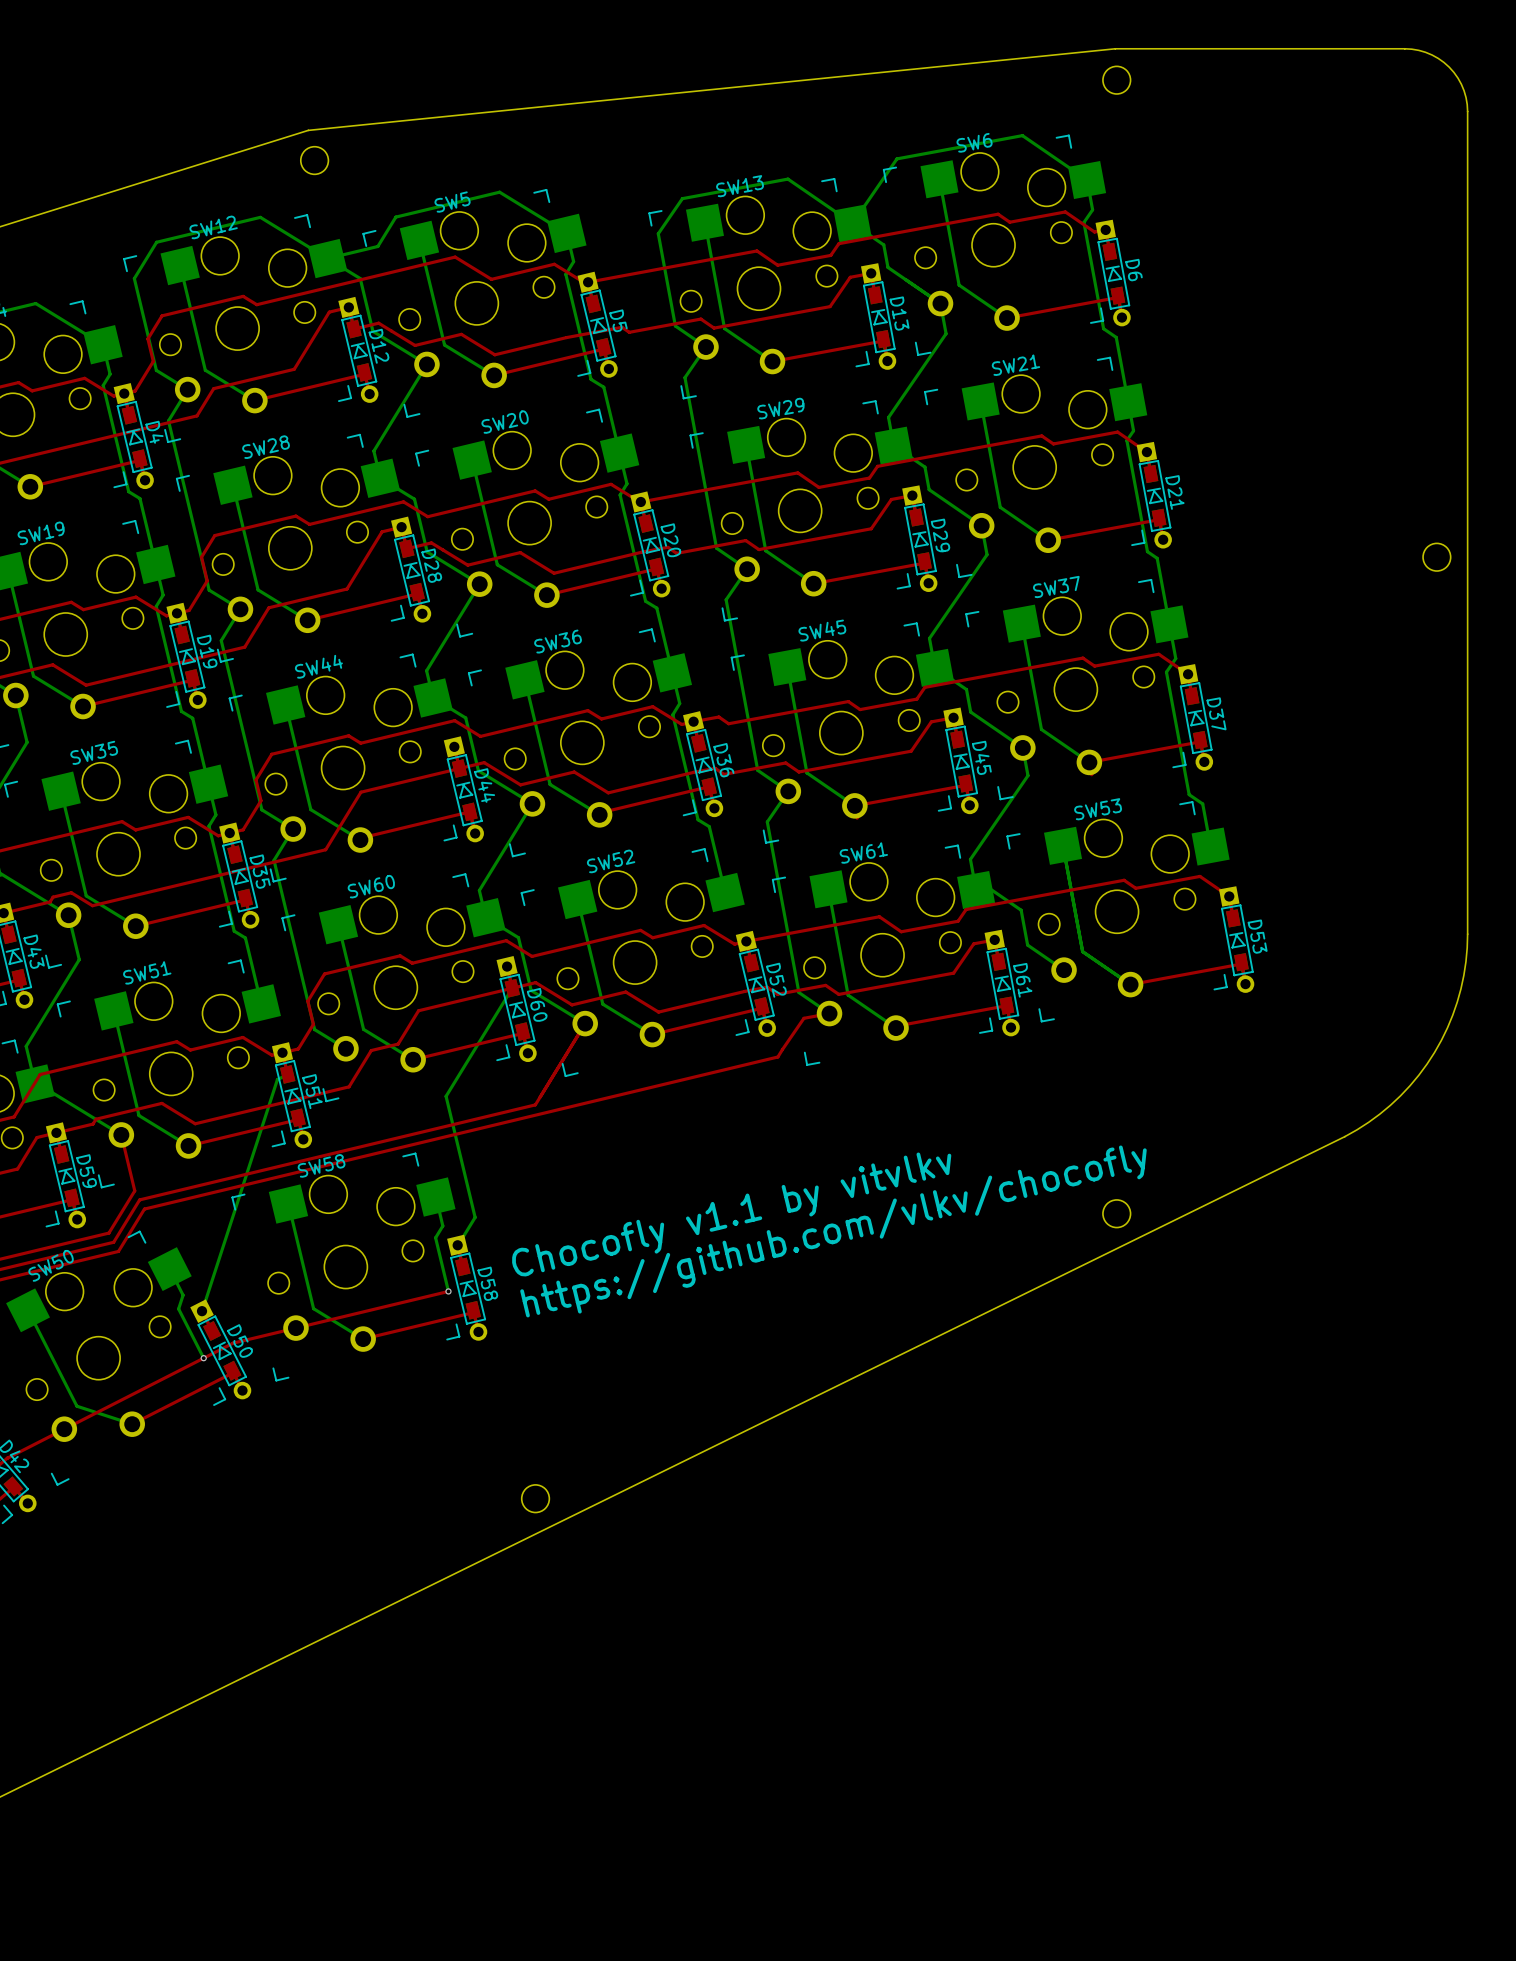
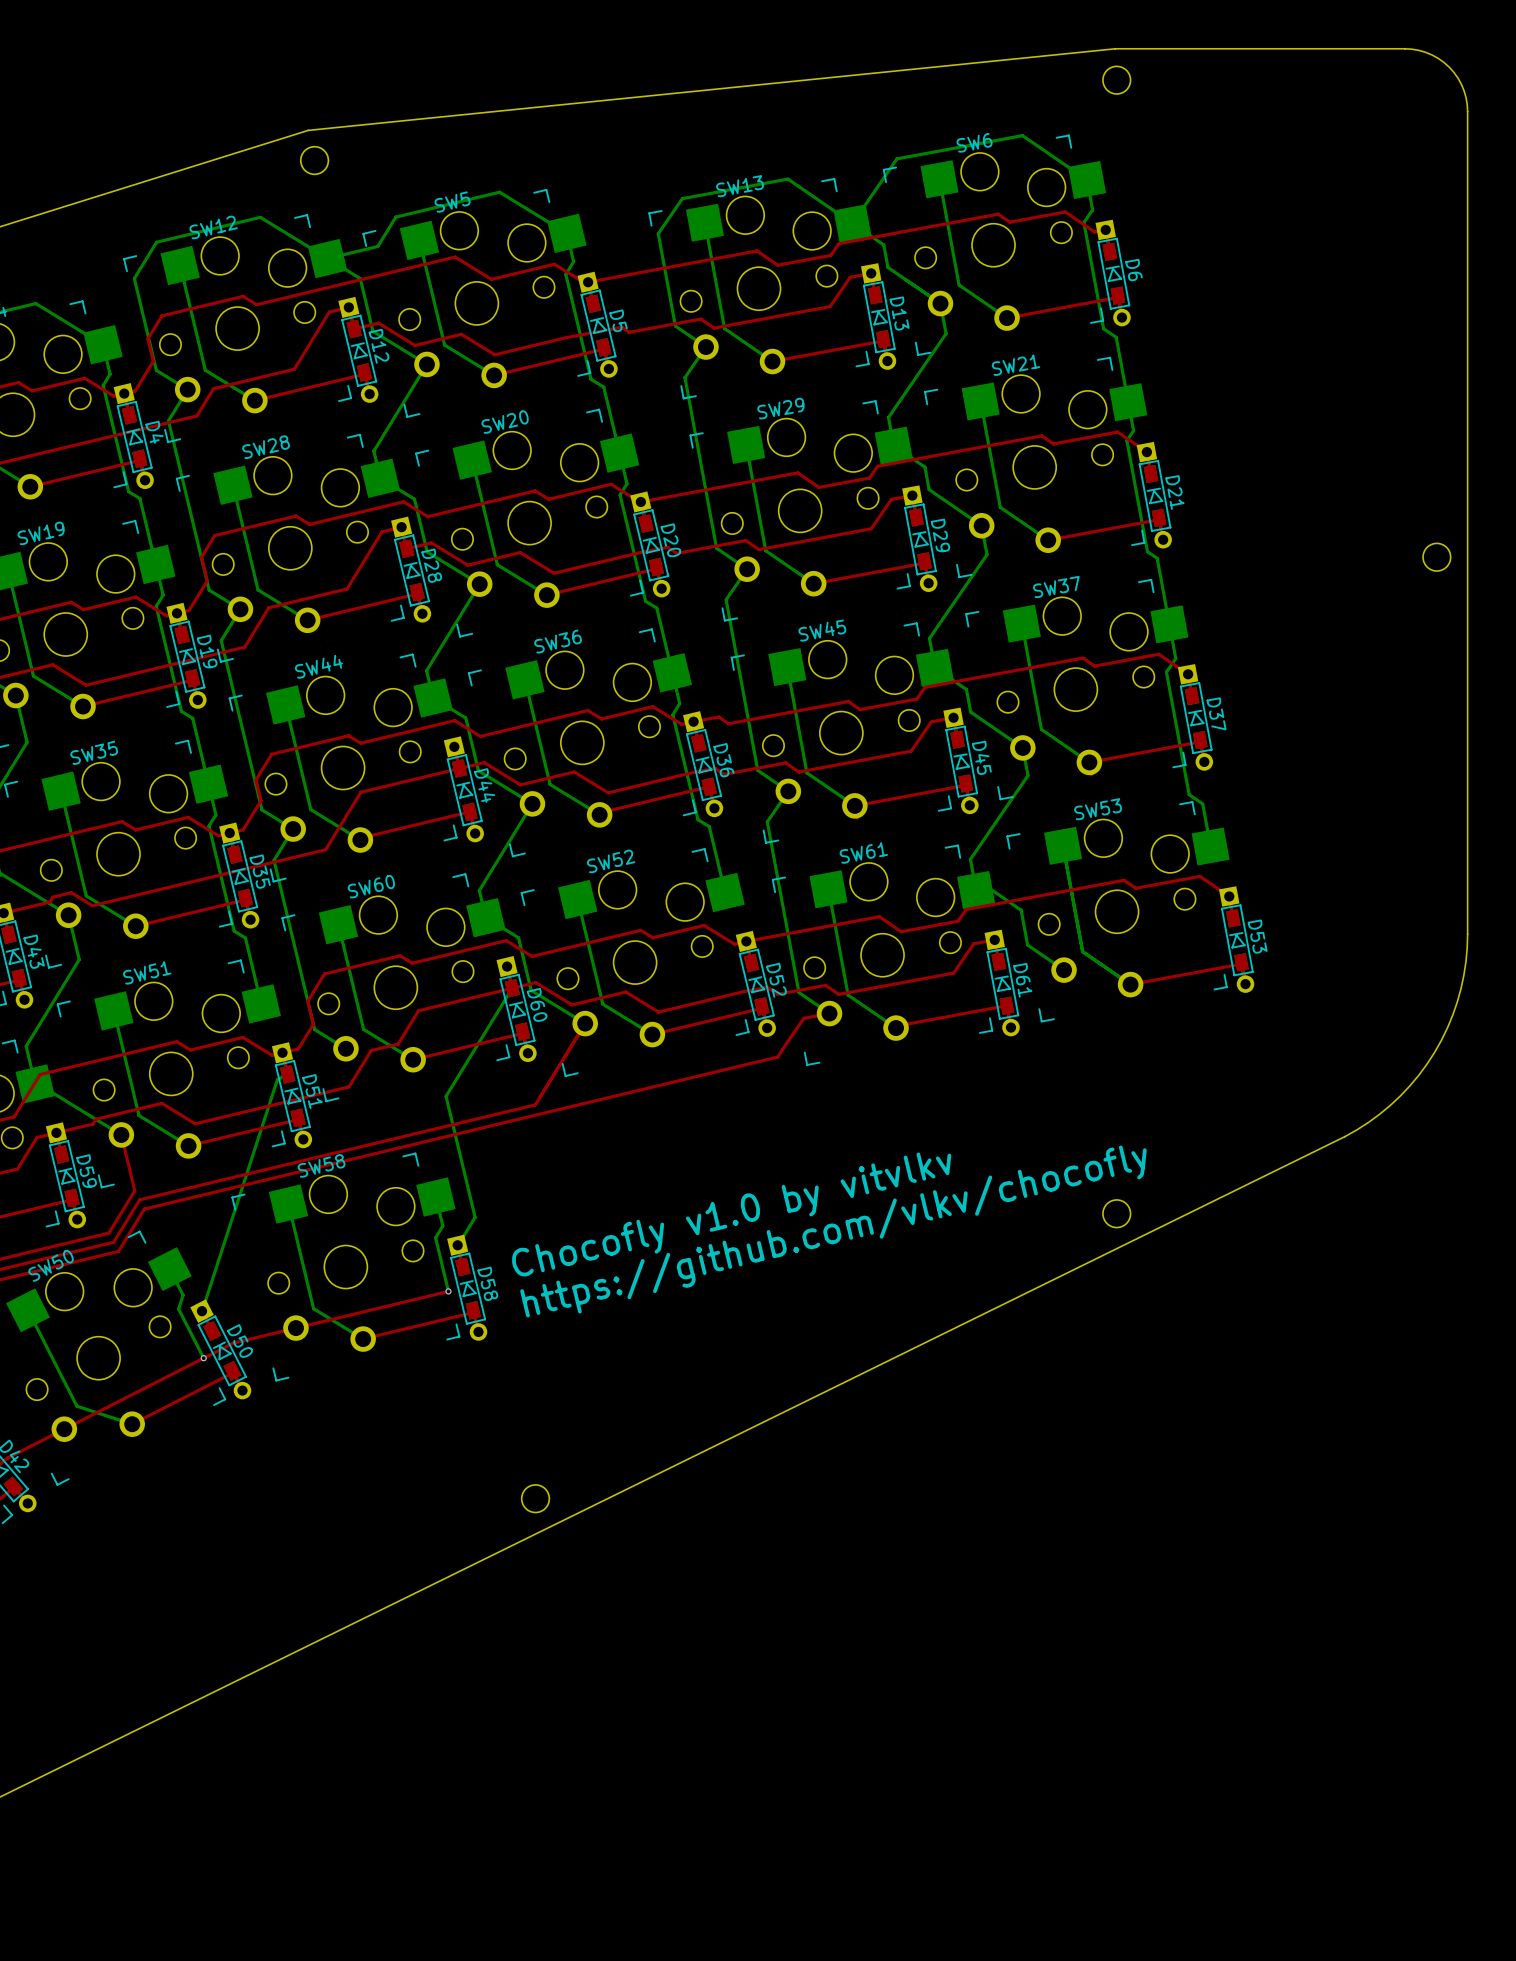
text: Chocofly v1.1 by vitvlkv (731, 1214) -> Chocofly v1.0 by vitvlkv (731, 1214)

